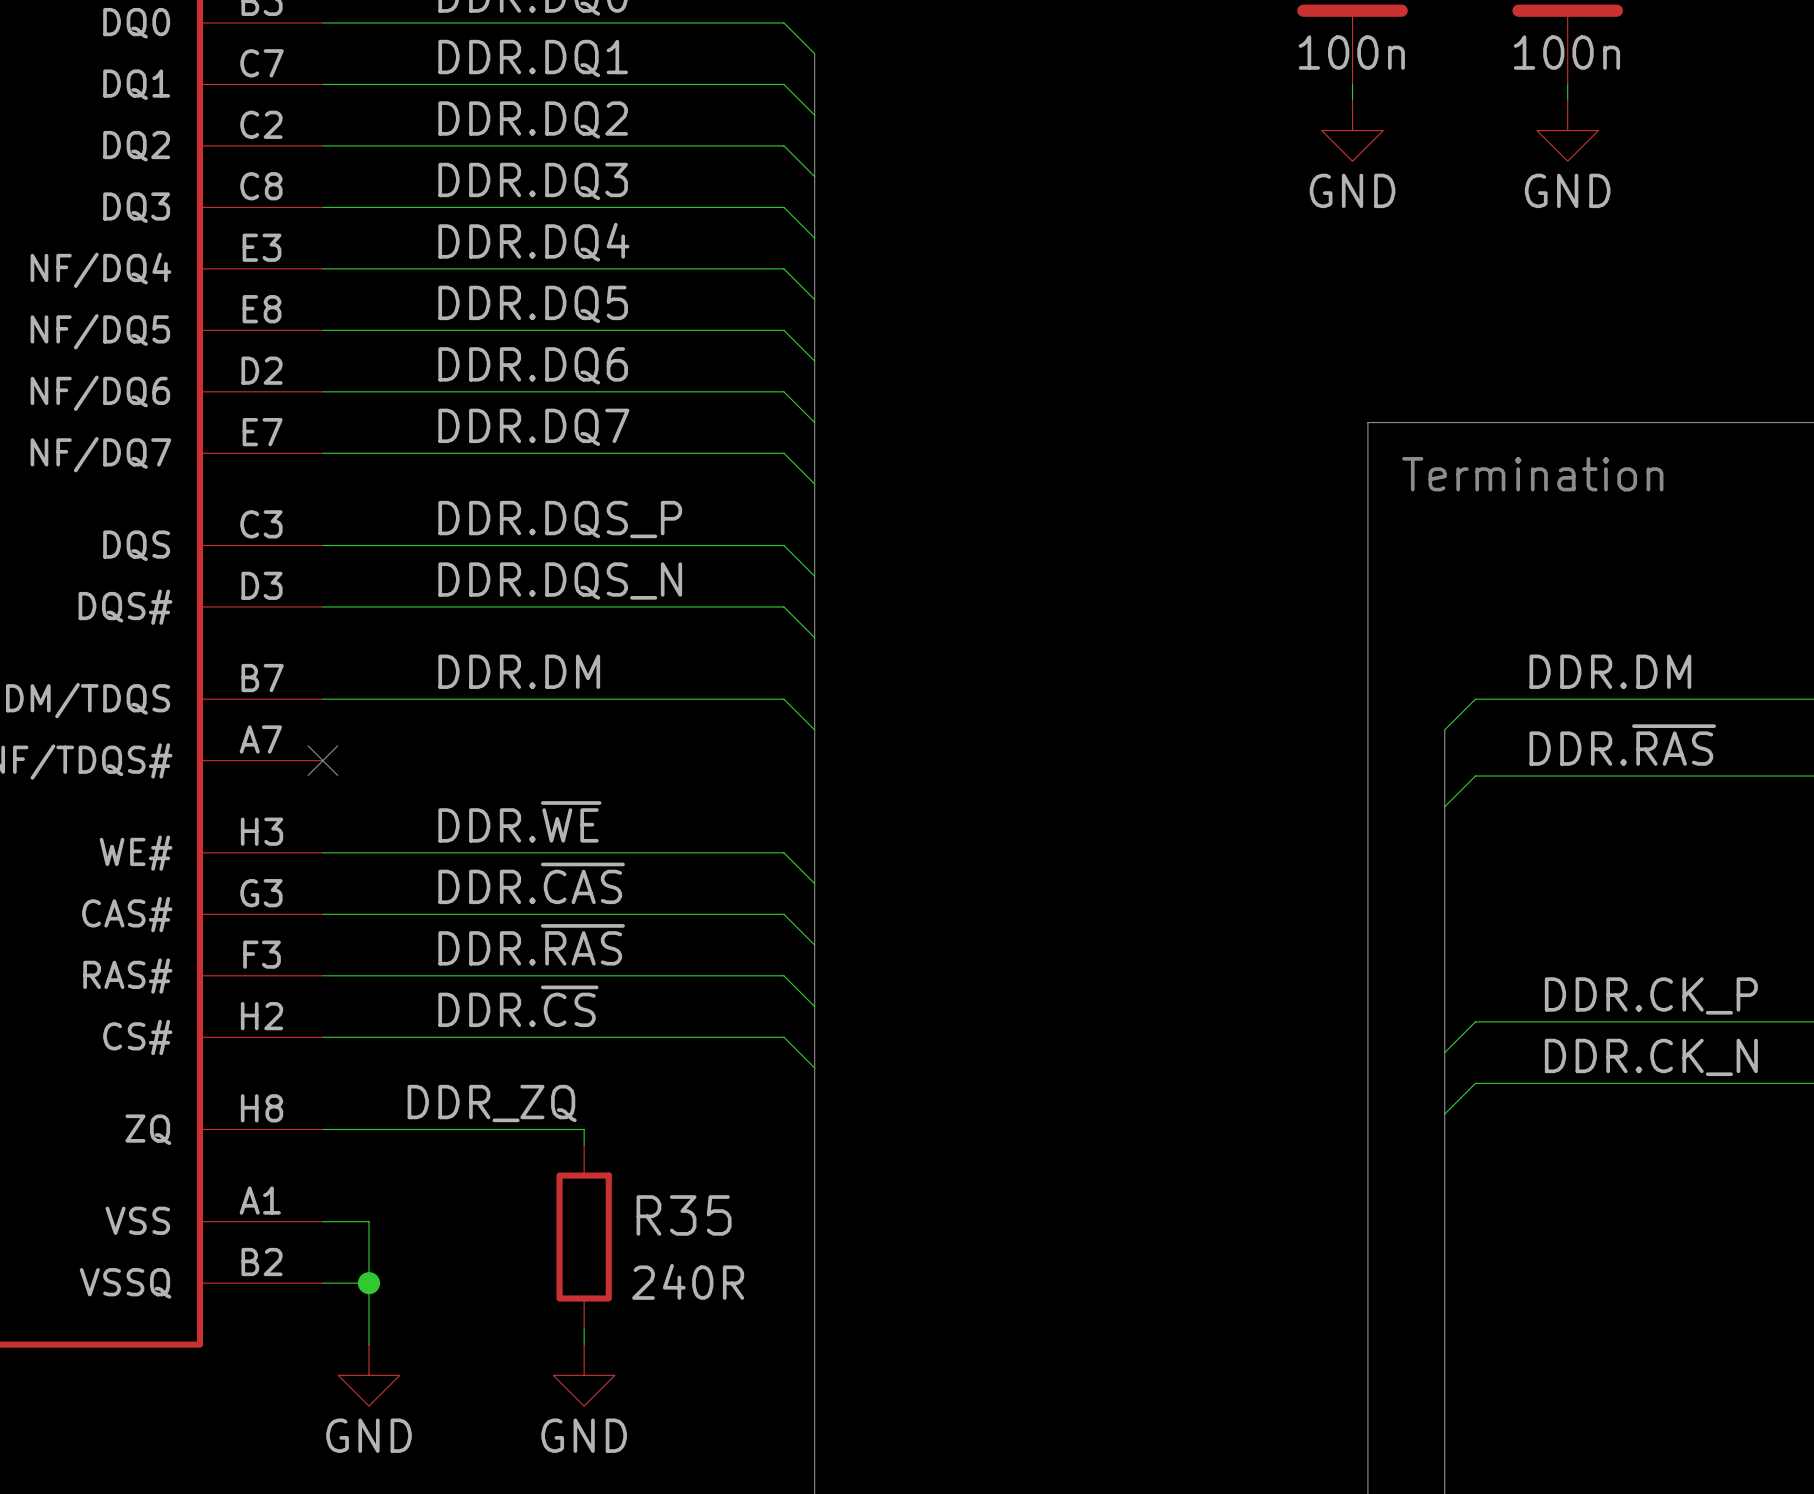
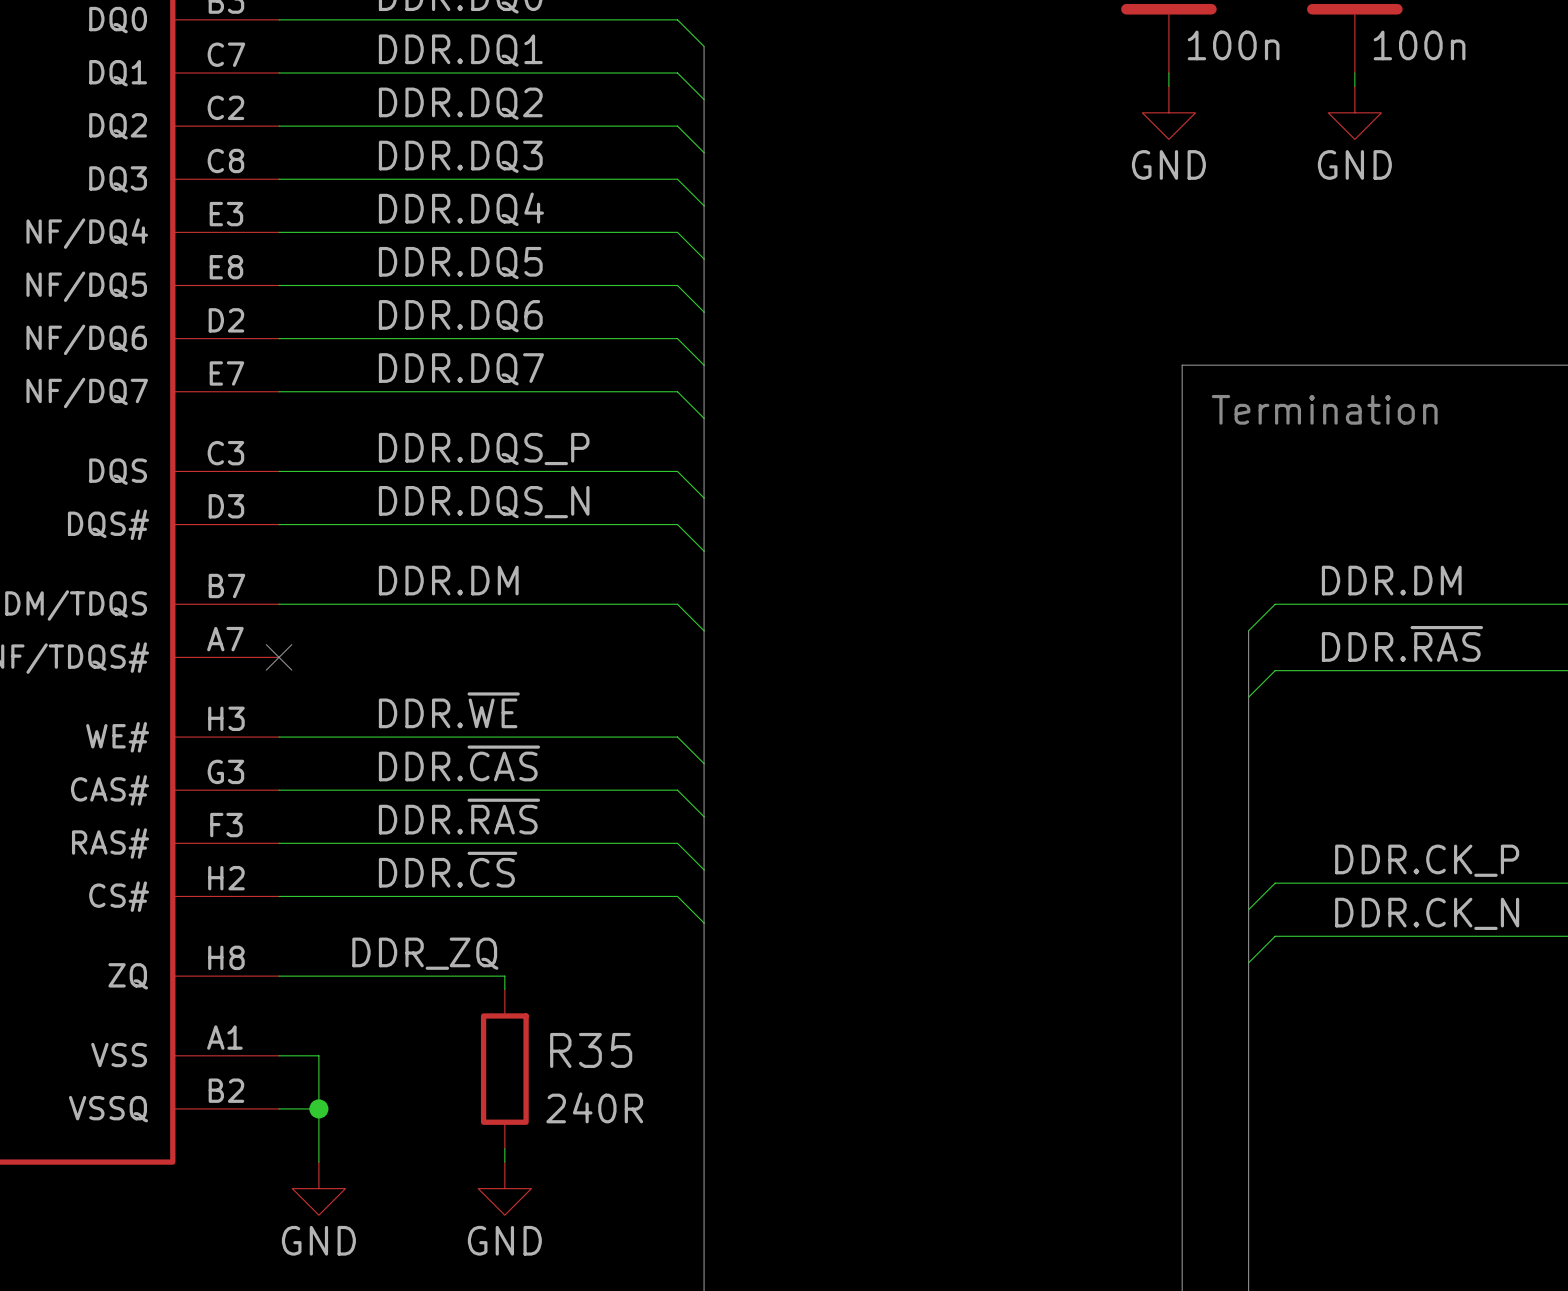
part text position: 100n (1351, 52) -> 100n (1233, 45)
part text position: 100n (1566, 52) -> 100n (1419, 45)

